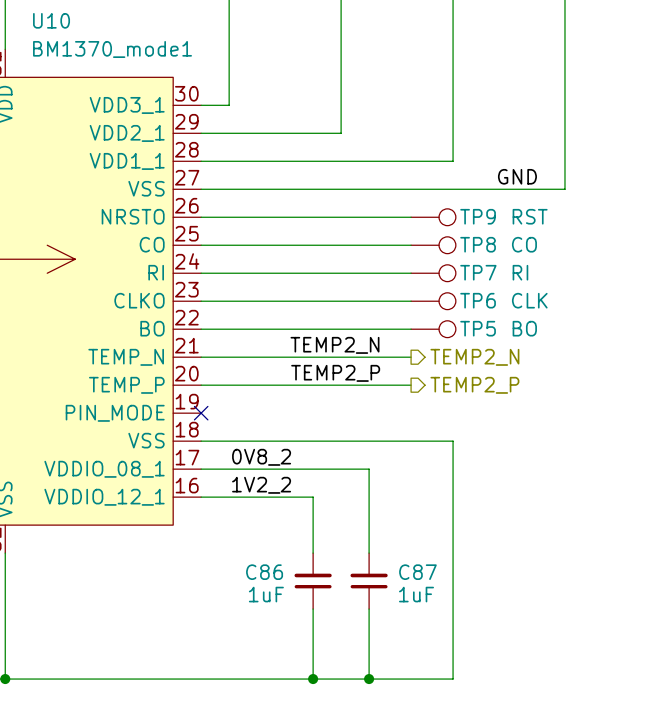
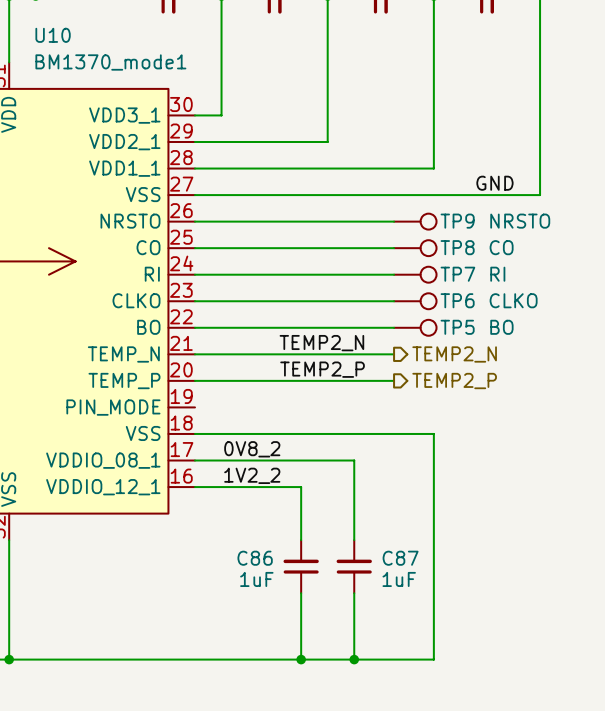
TP9 value: RST (530, 216) -> NRSTO (520, 221)
TP6 value: CLK (529, 300) -> CLKO (513, 300)
no-connect mark: (201, 413) -> none

